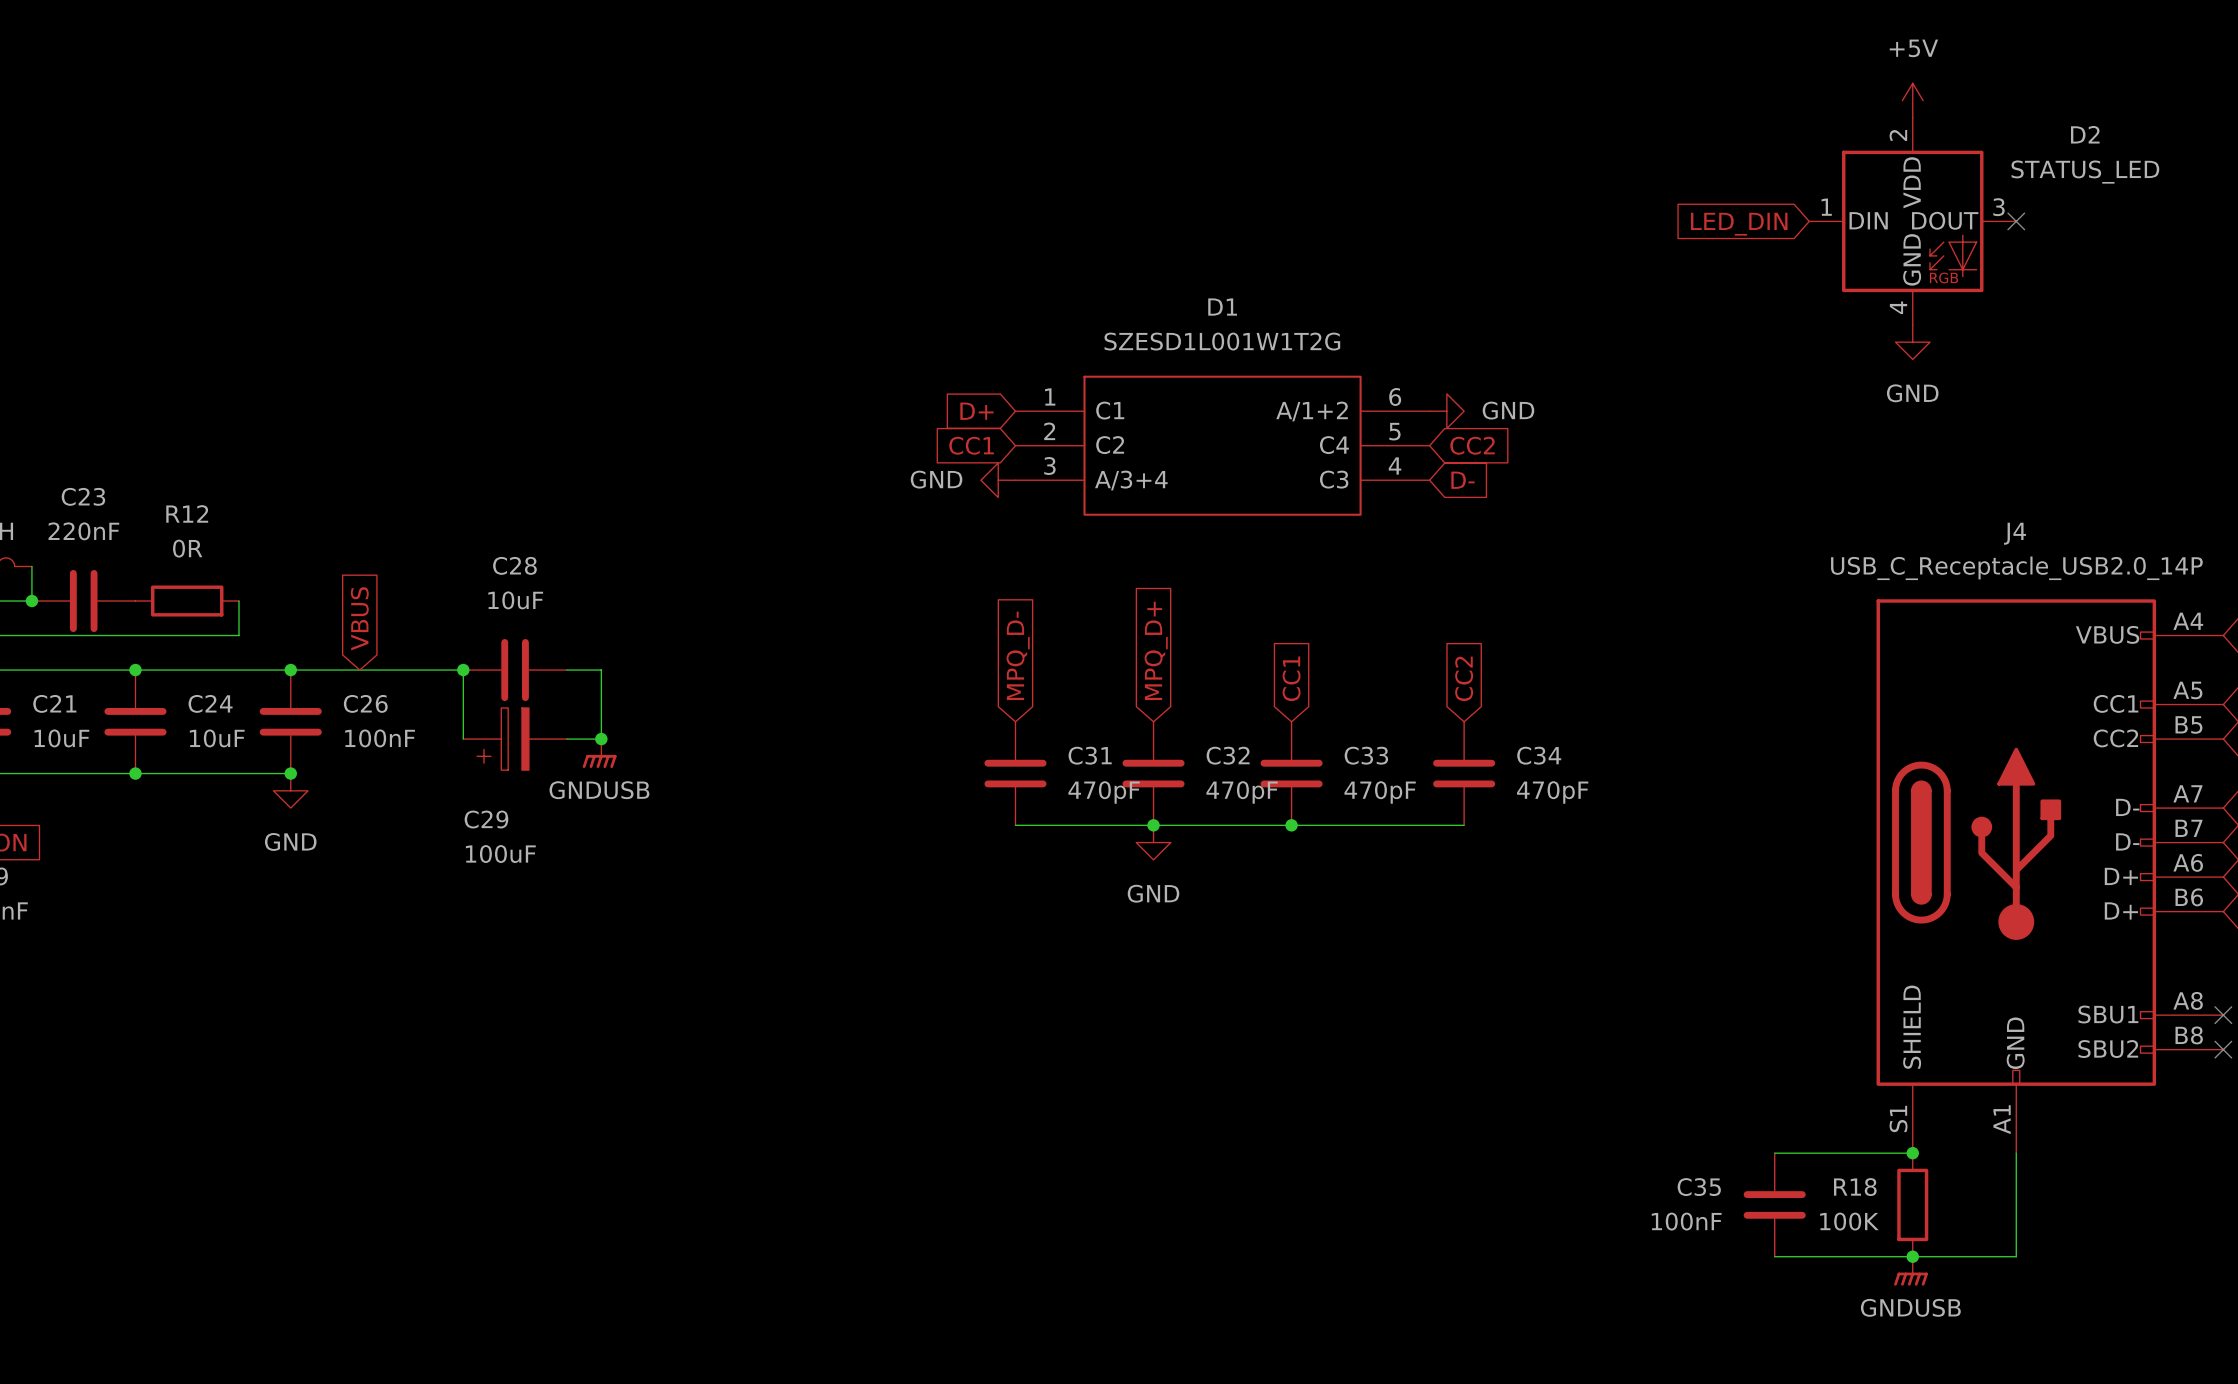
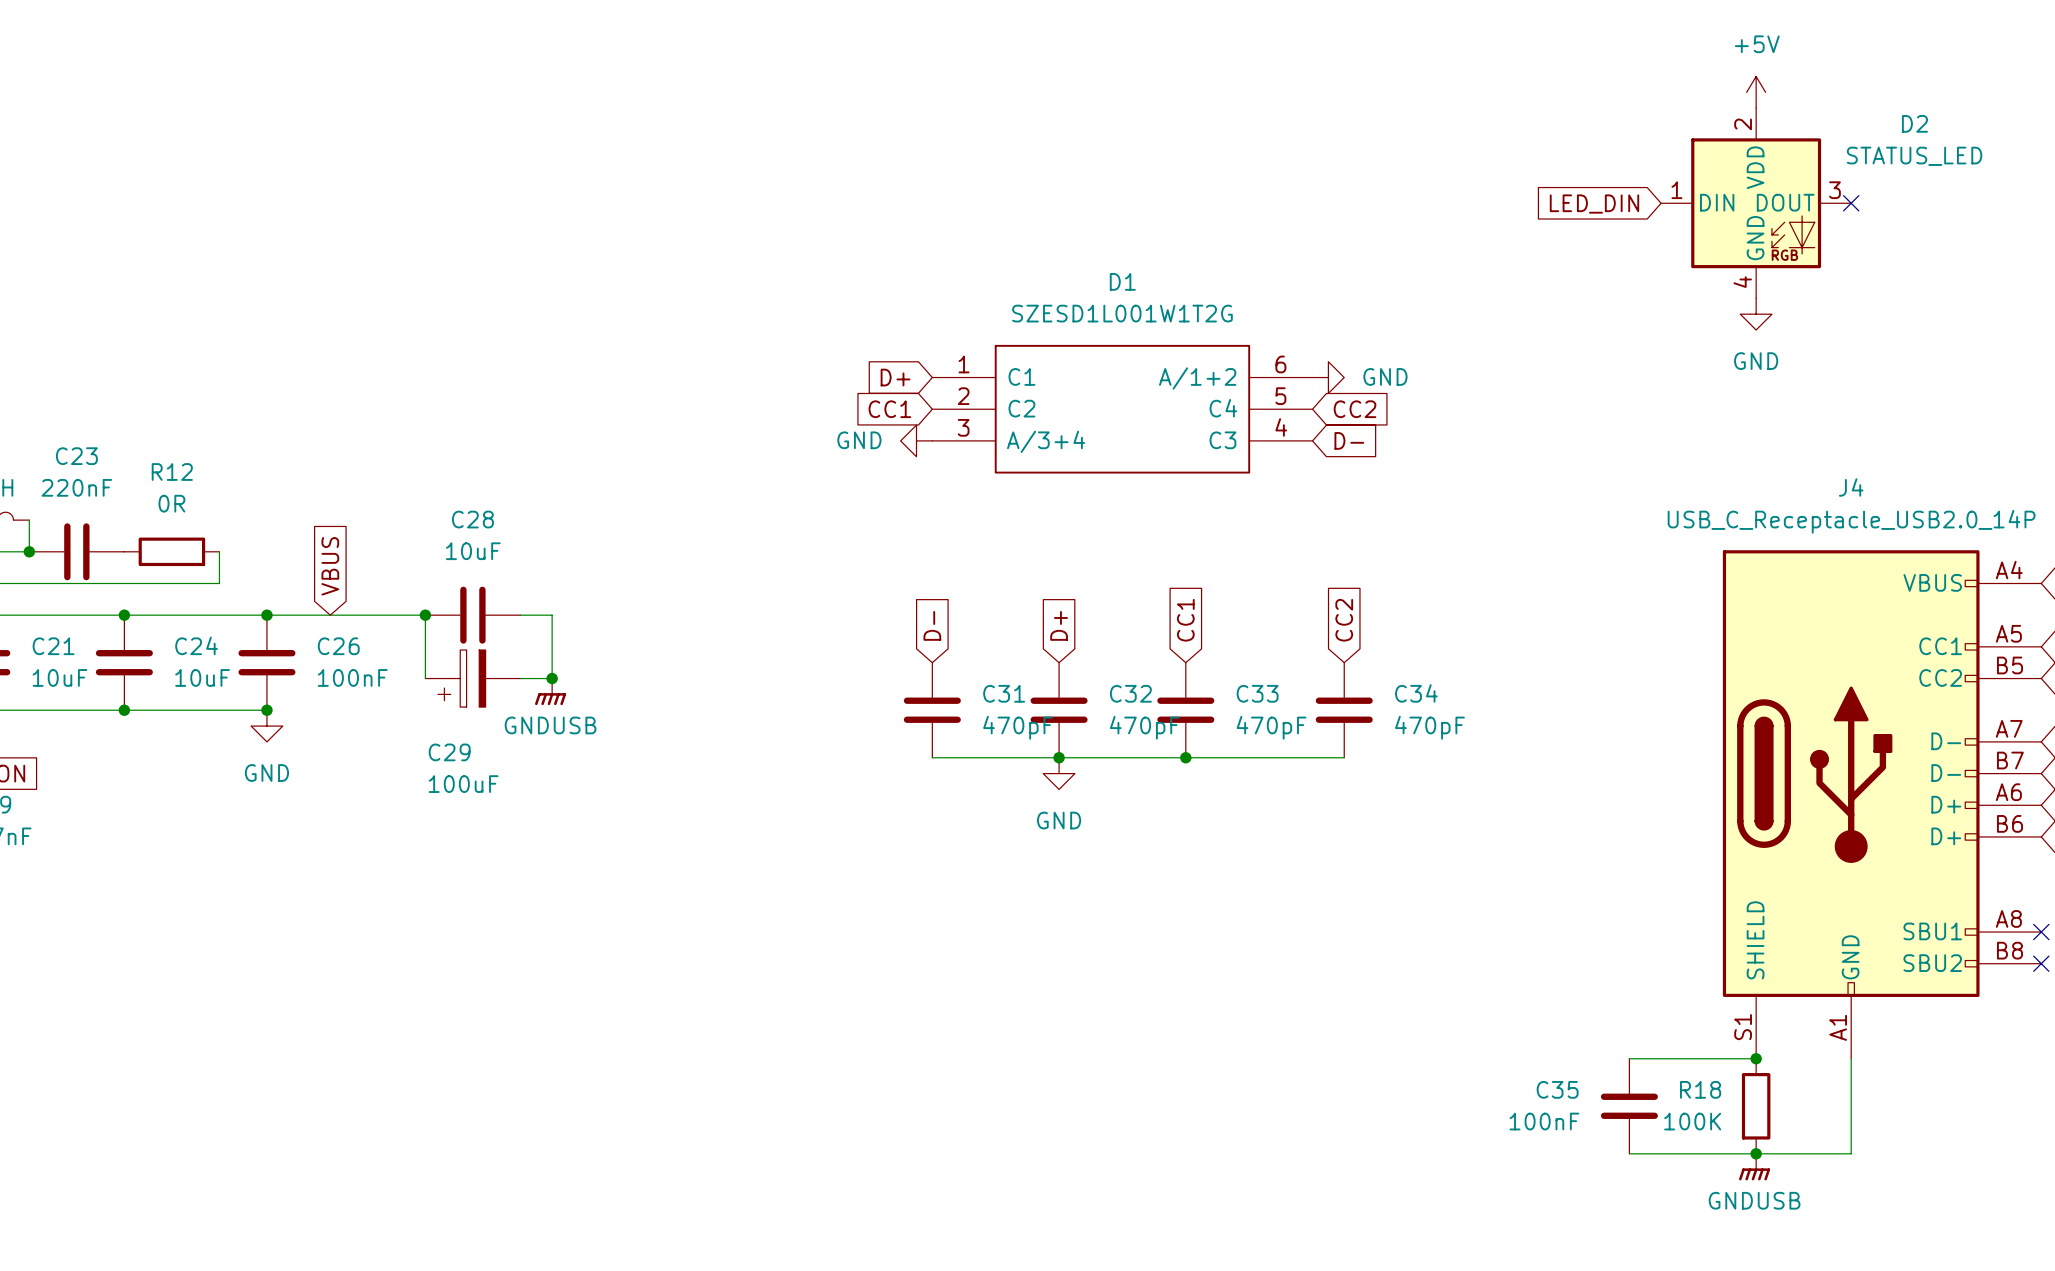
global label: MPQ_D+ (1156, 650) -> D+ (1059, 625)
global label: MPQ_D- (1018, 655) -> D- (932, 625)

